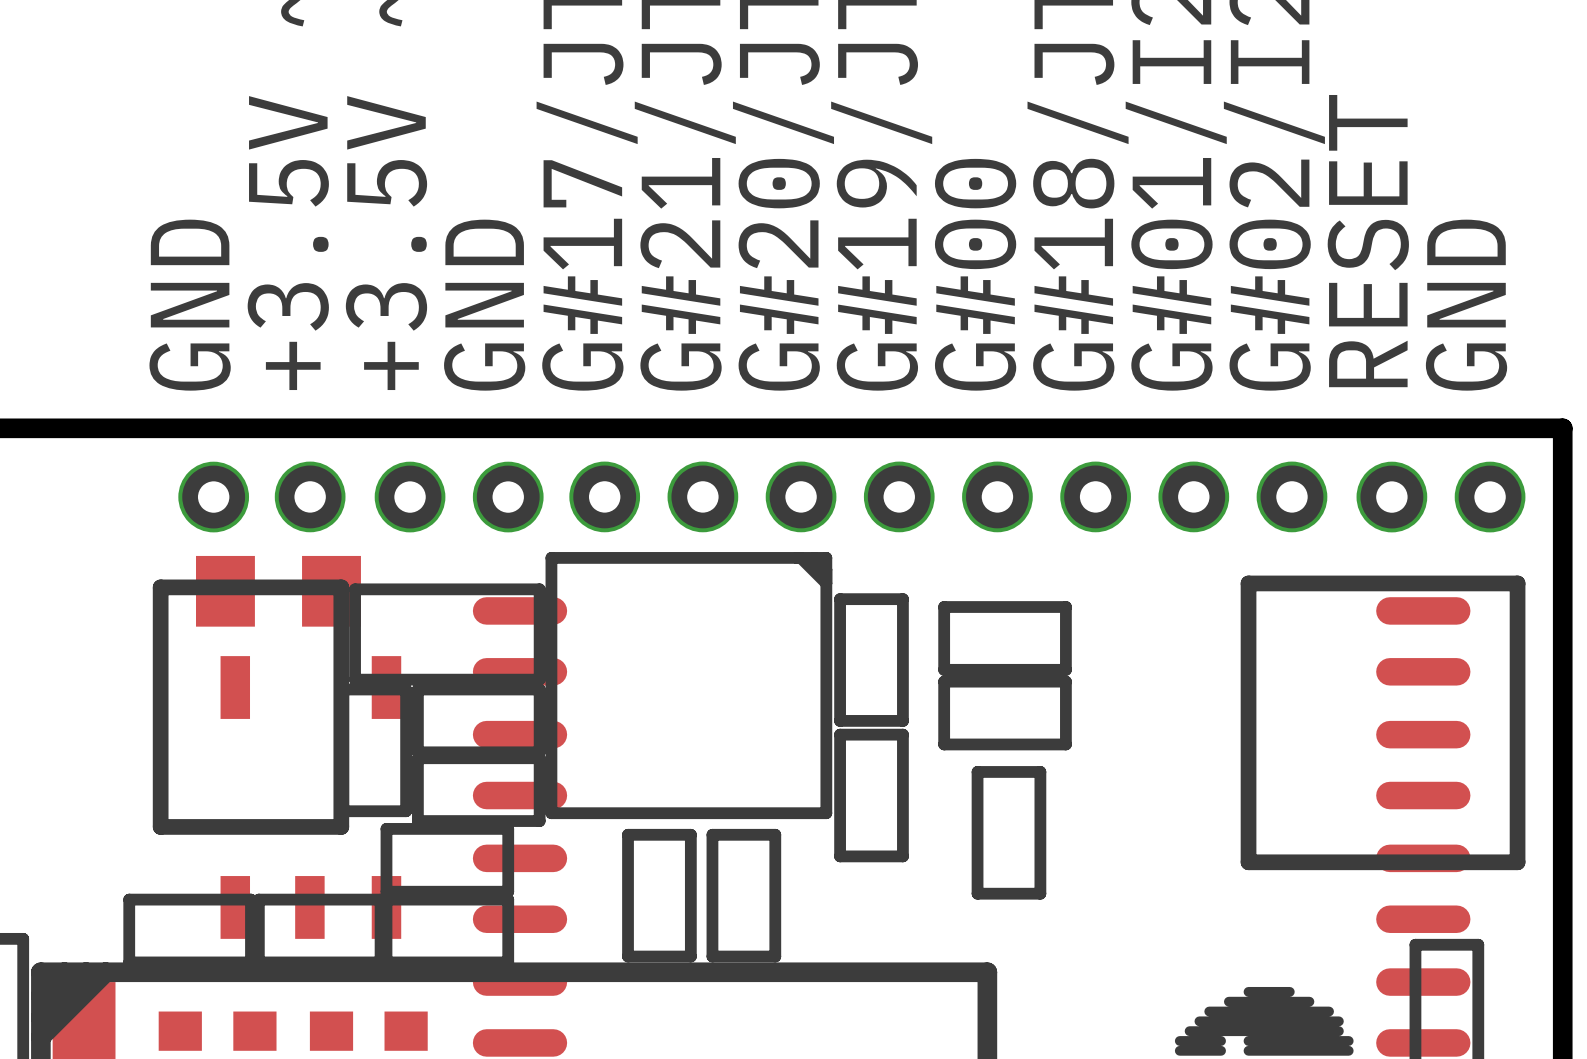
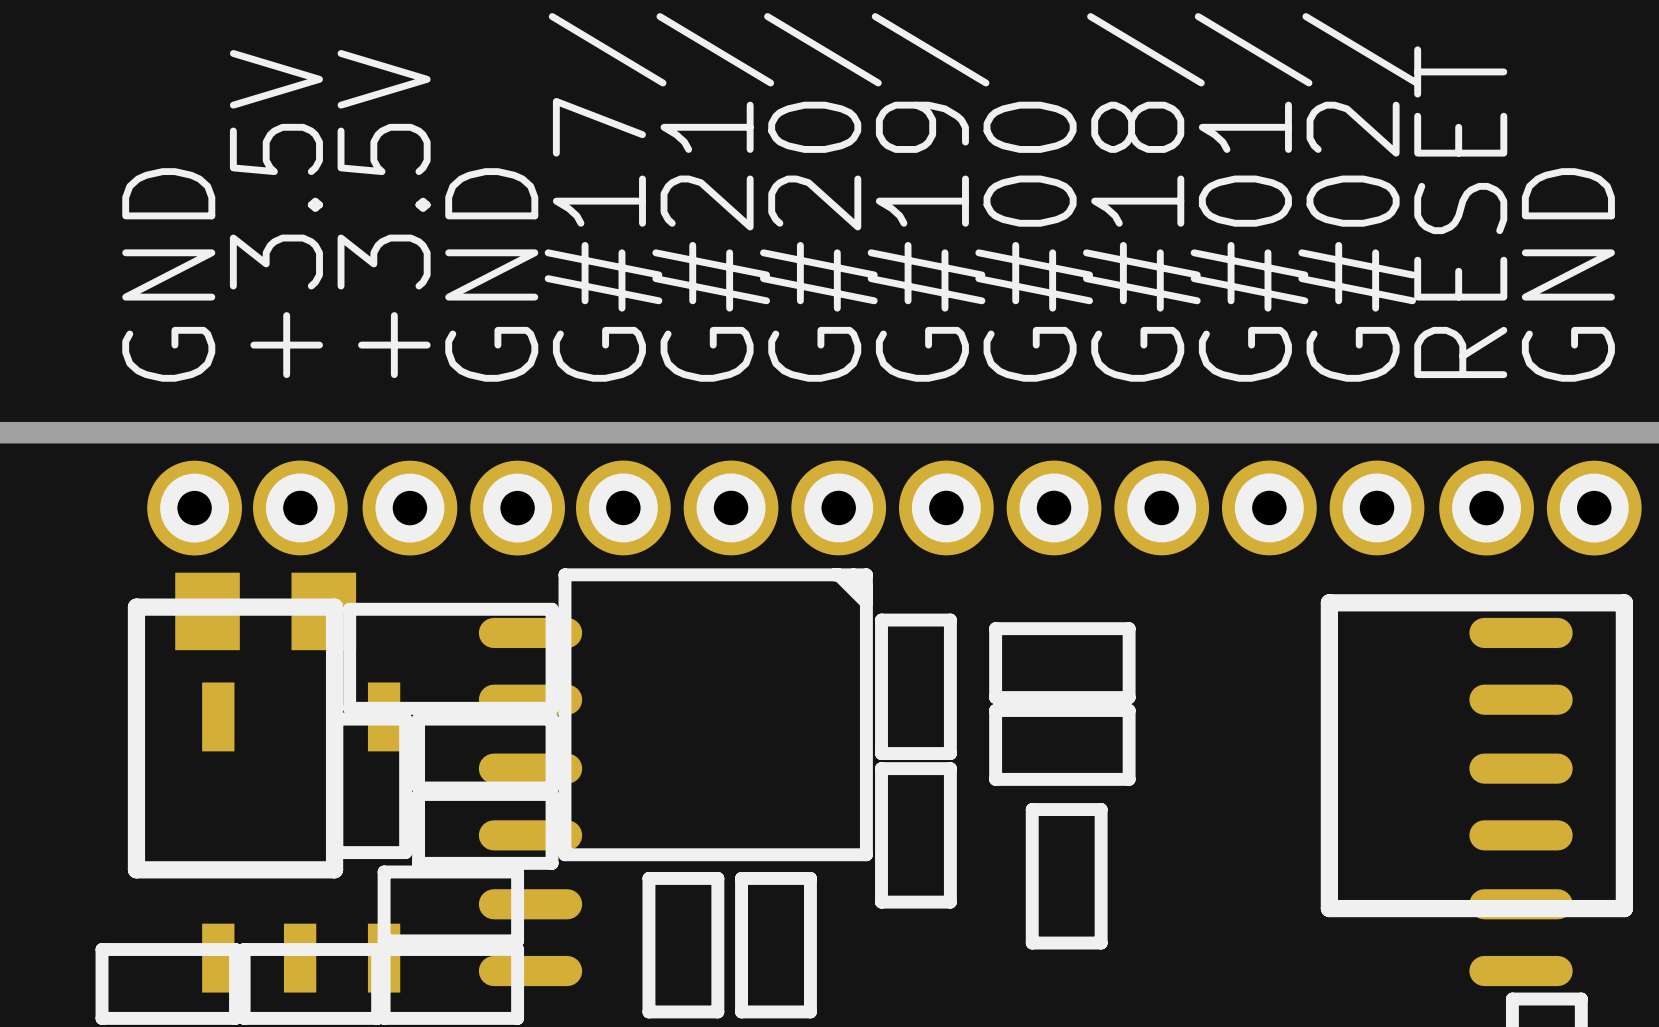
part footprint: [178, 461, 250, 533] -> [147, 460, 242, 556]
part footprint: [274, 461, 346, 533] -> [253, 460, 348, 556]
part footprint: [374, 461, 446, 533] -> [362, 460, 458, 556]
part footprint: [472, 461, 544, 533] -> [470, 460, 565, 556]
part footprint: [569, 461, 641, 533] -> [576, 460, 671, 556]
part footprint: [667, 461, 739, 533] -> [683, 460, 779, 556]
part footprint: [765, 461, 837, 533] -> [791, 460, 887, 556]
part footprint: [863, 461, 935, 533] -> [899, 460, 994, 556]
part footprint: [962, 461, 1033, 533] -> [1006, 460, 1102, 556]
part footprint: [1060, 461, 1131, 533] -> [1114, 460, 1210, 556]
part footprint: [1158, 461, 1230, 533] -> [1221, 460, 1317, 556]
part footprint: [1256, 461, 1328, 533] -> [1329, 460, 1425, 556]
part footprint: [1356, 461, 1428, 533] -> [1439, 460, 1534, 556]
part footprint: [1454, 461, 1526, 533] -> [1546, 460, 1642, 556]

